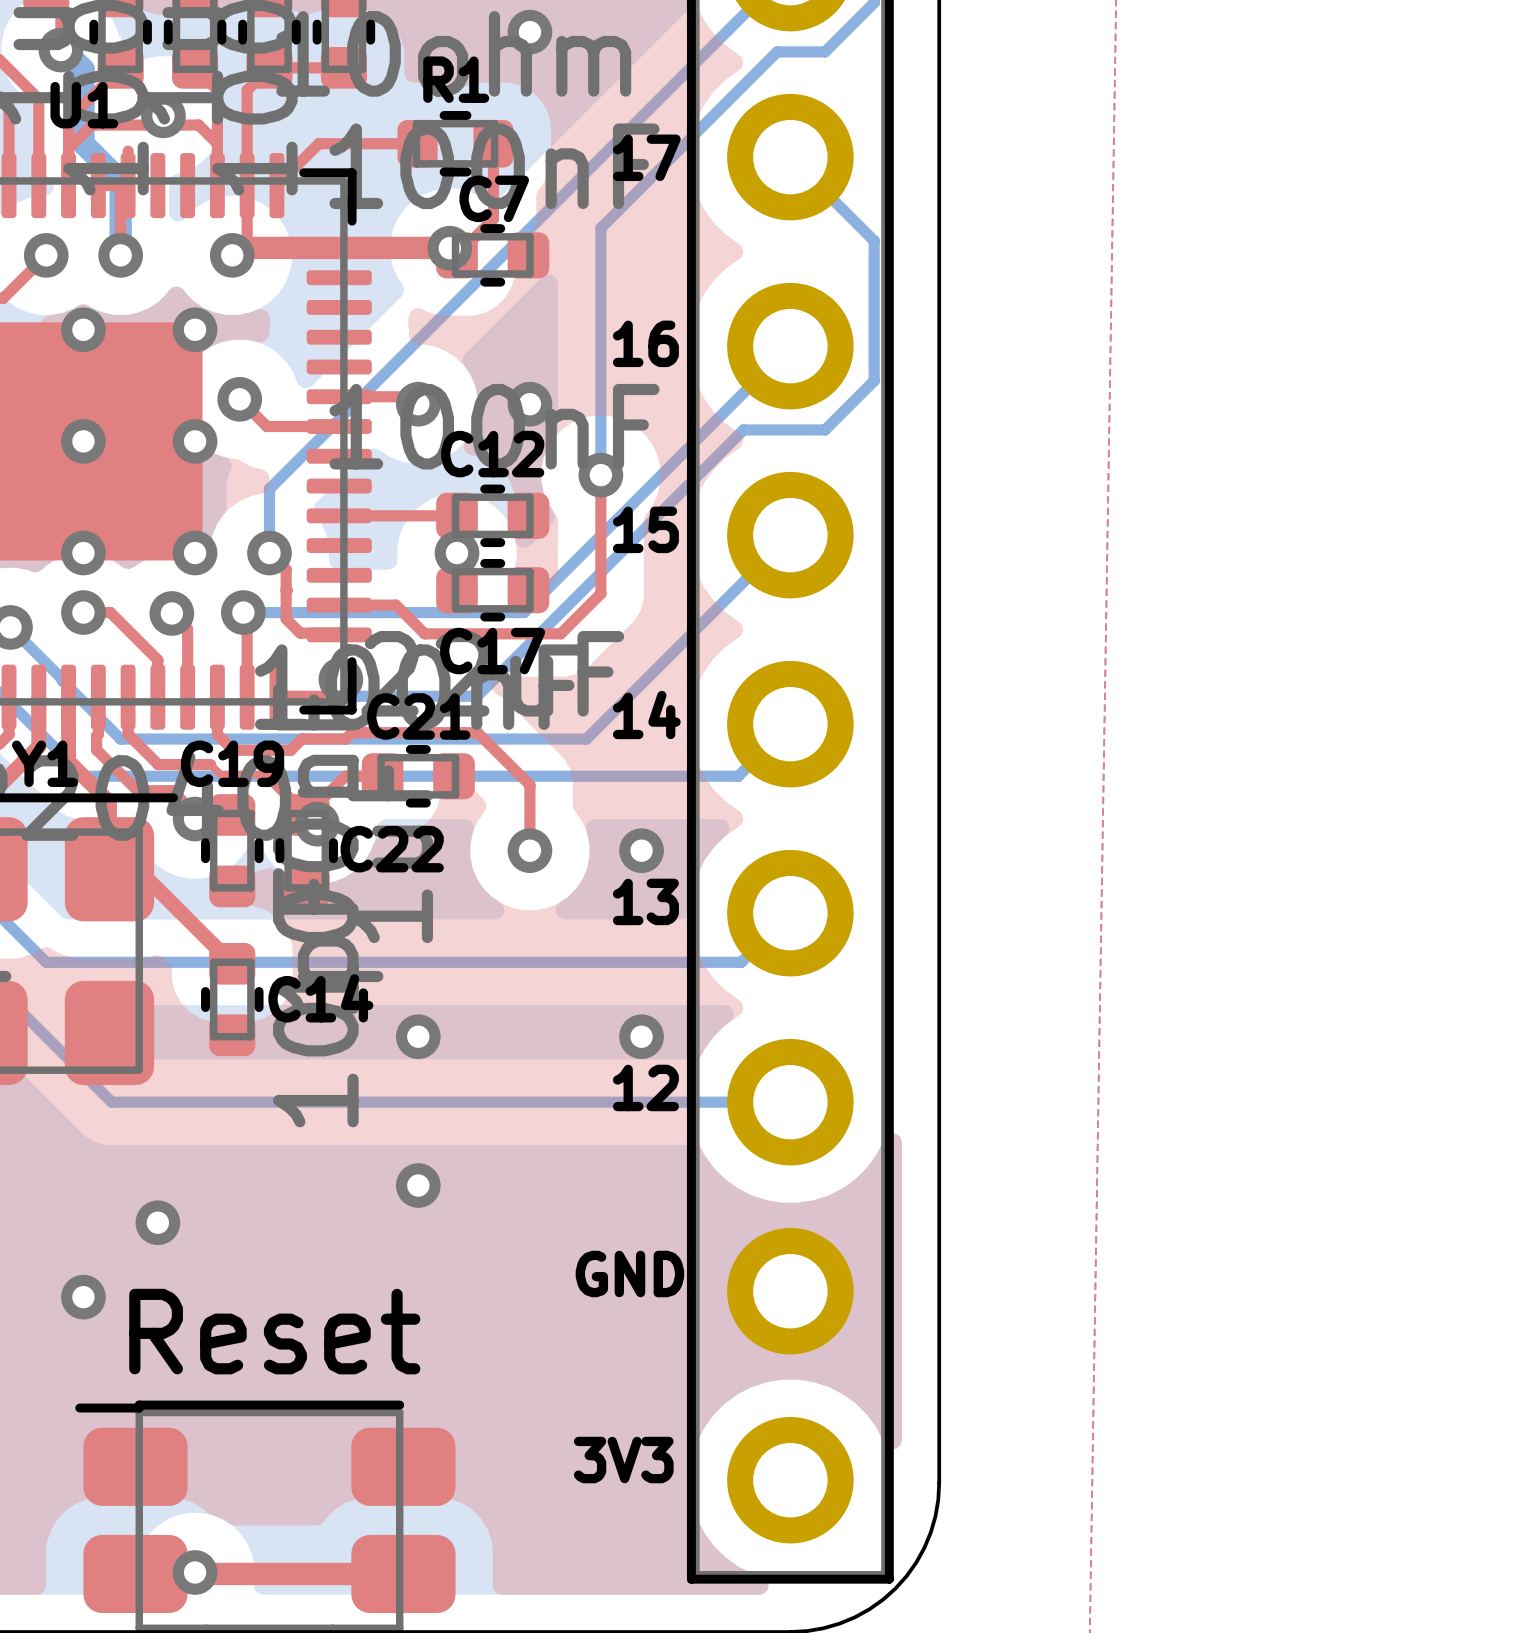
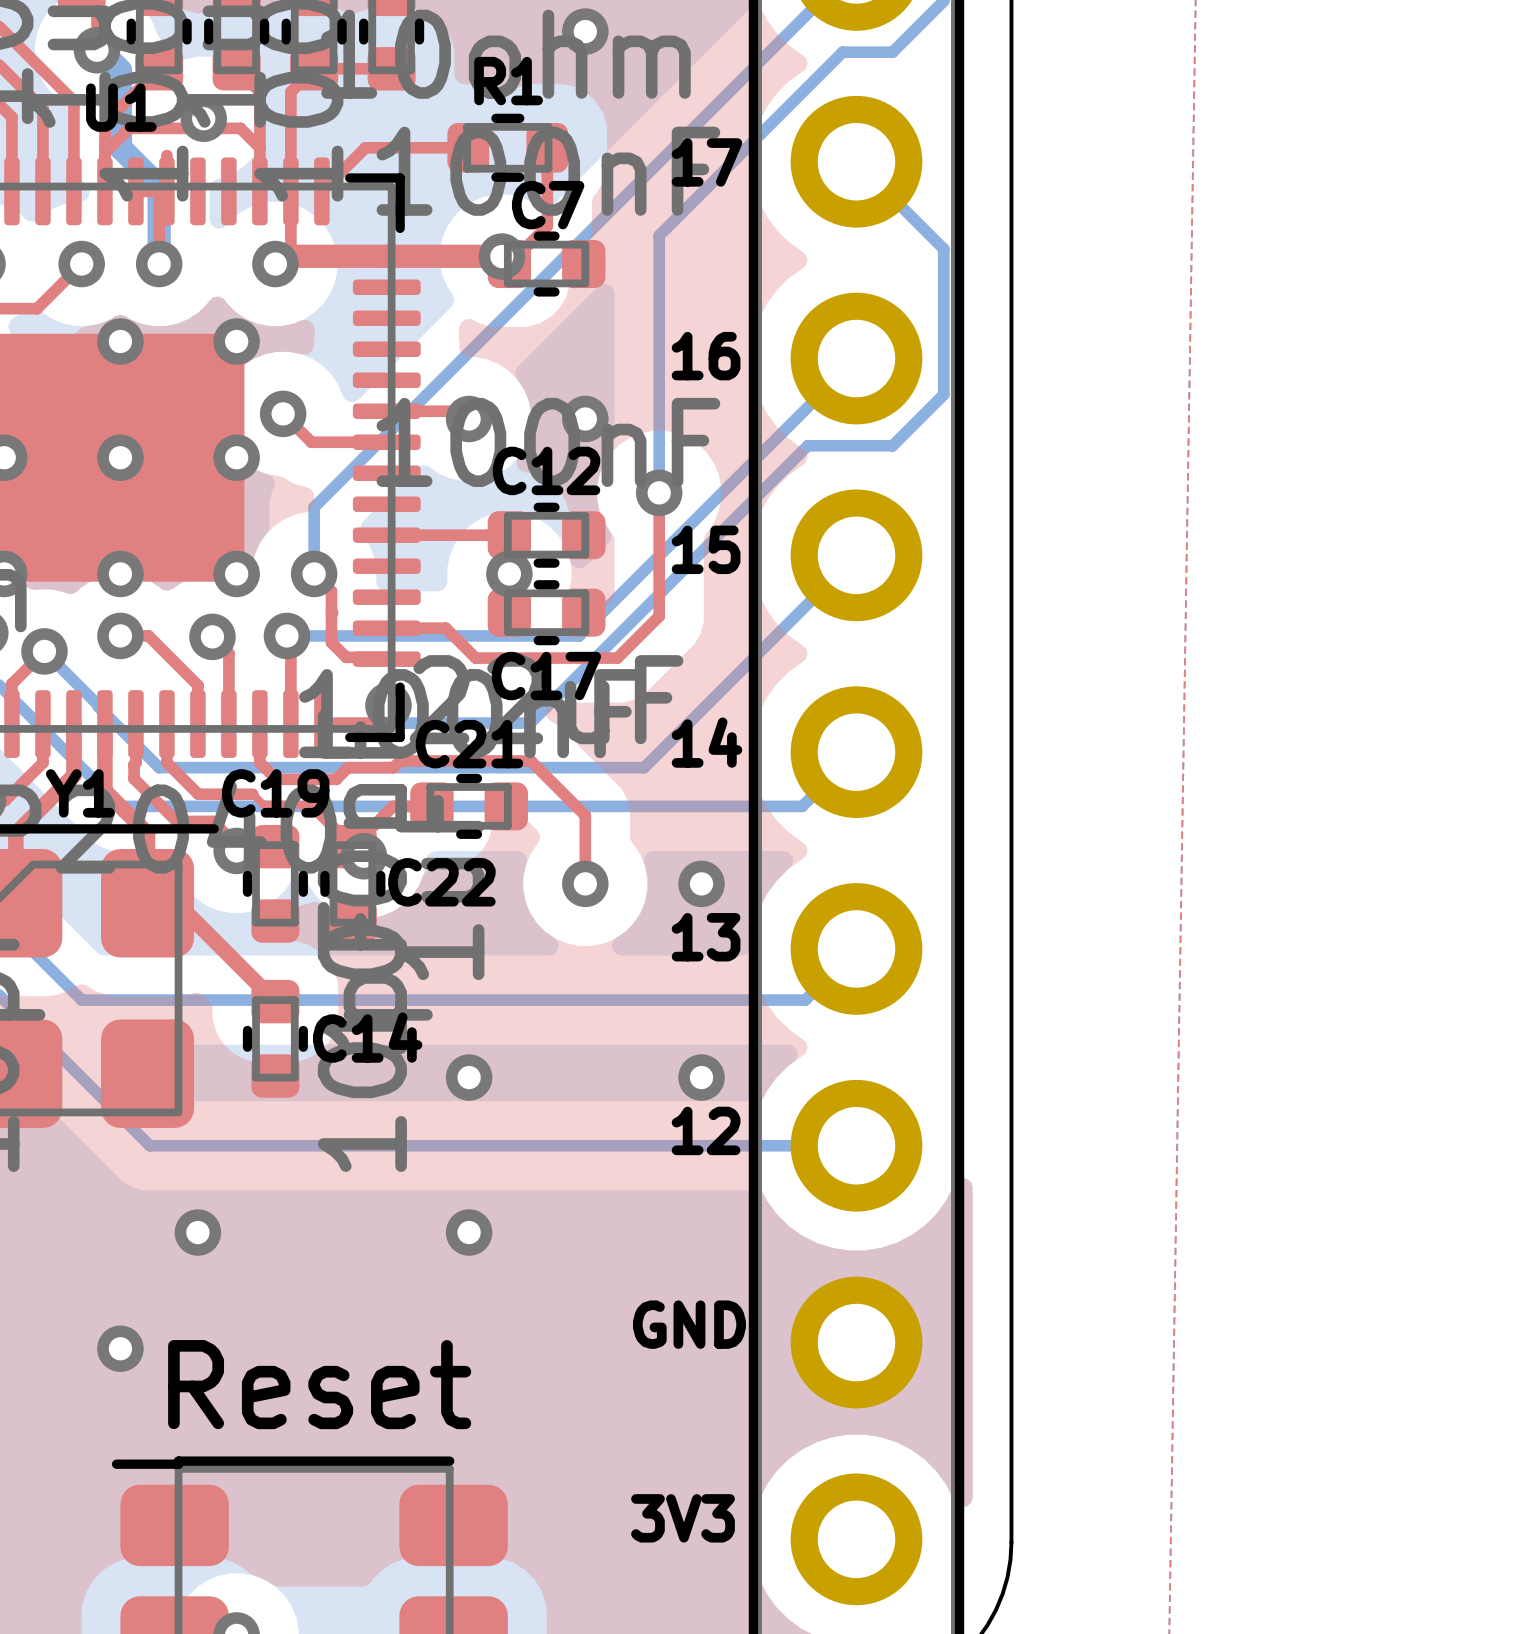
via position: (157, 1222) -> (197, 1232)

